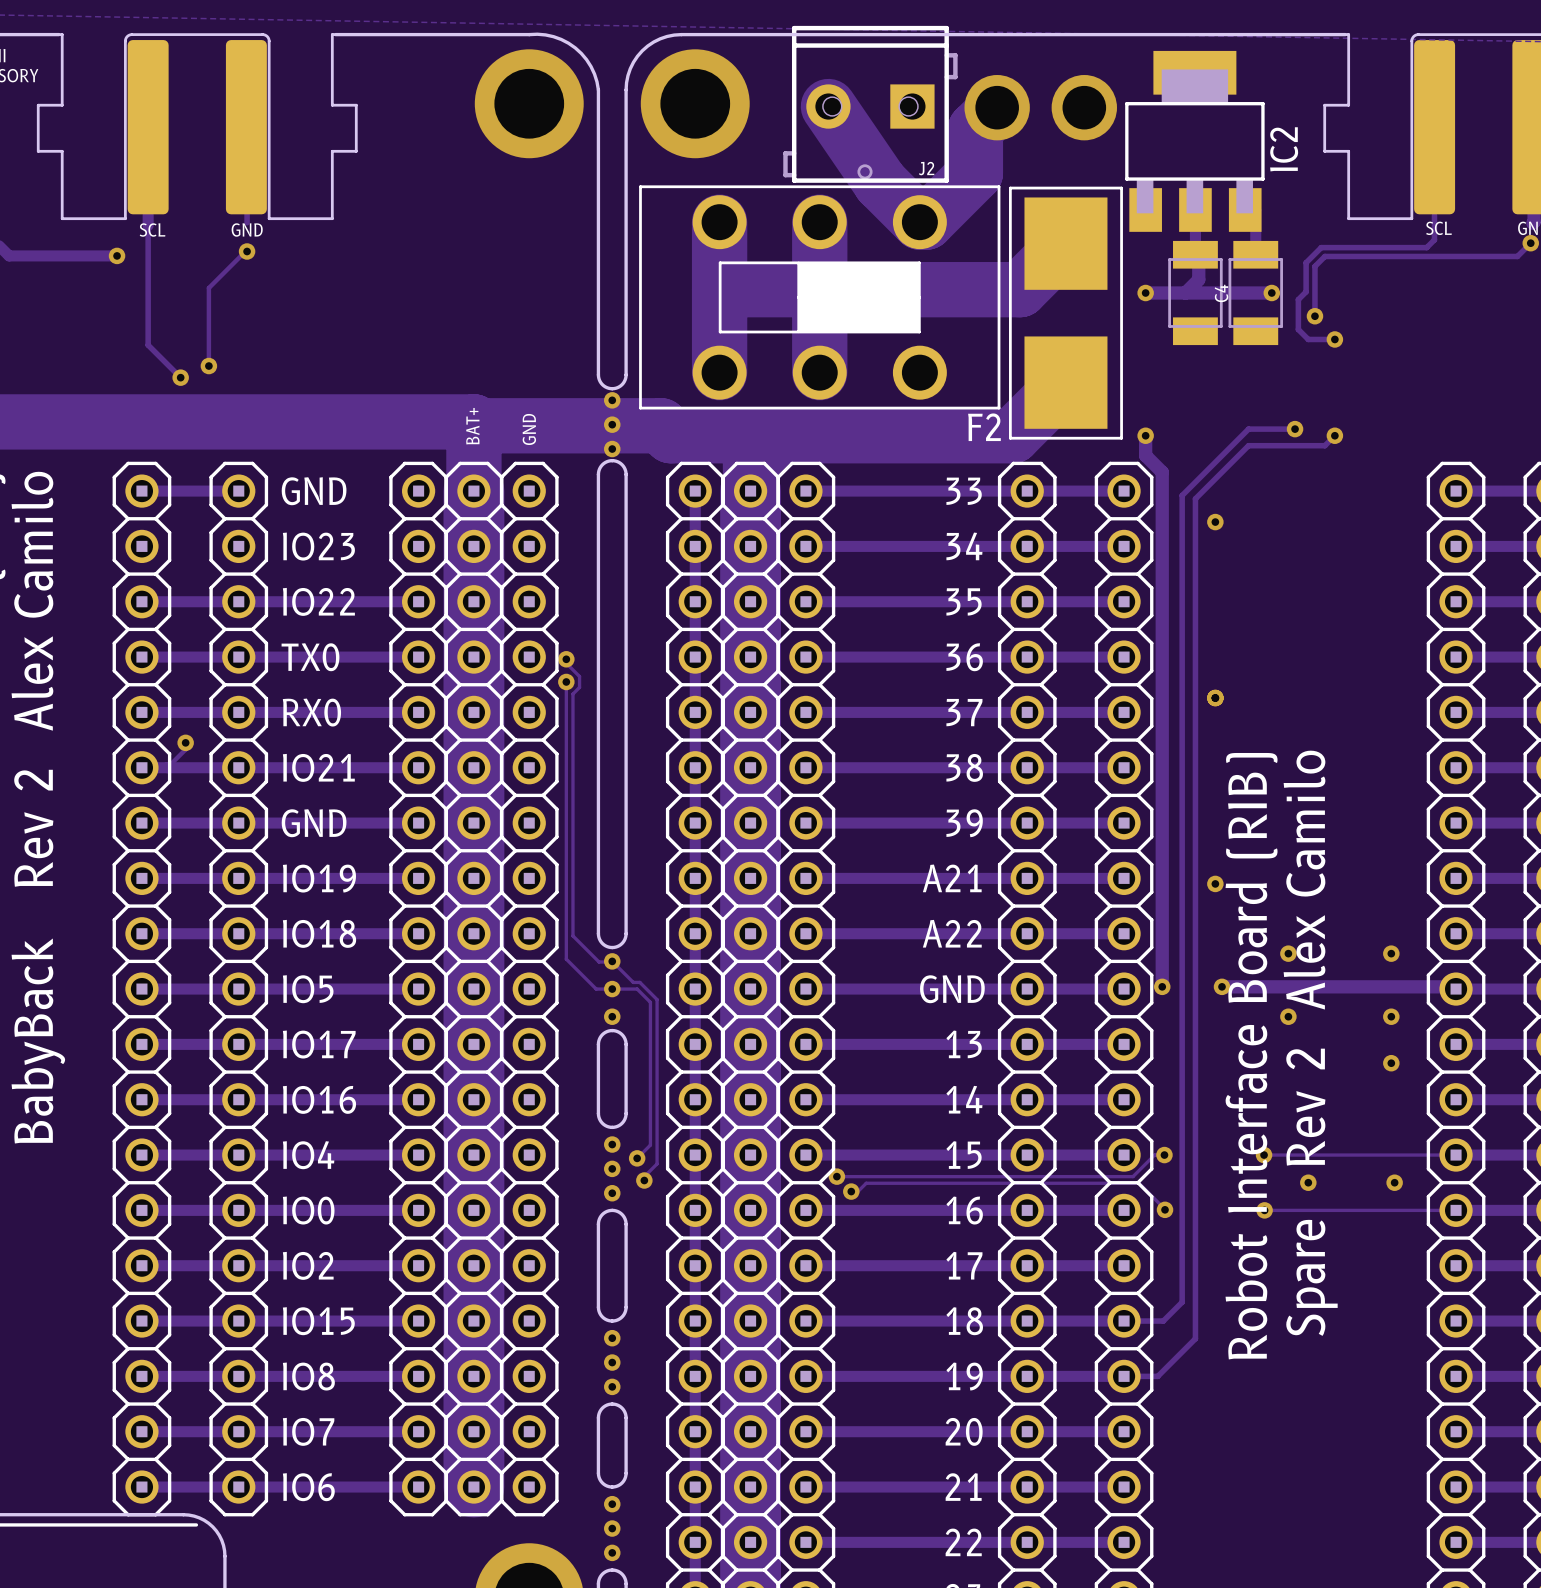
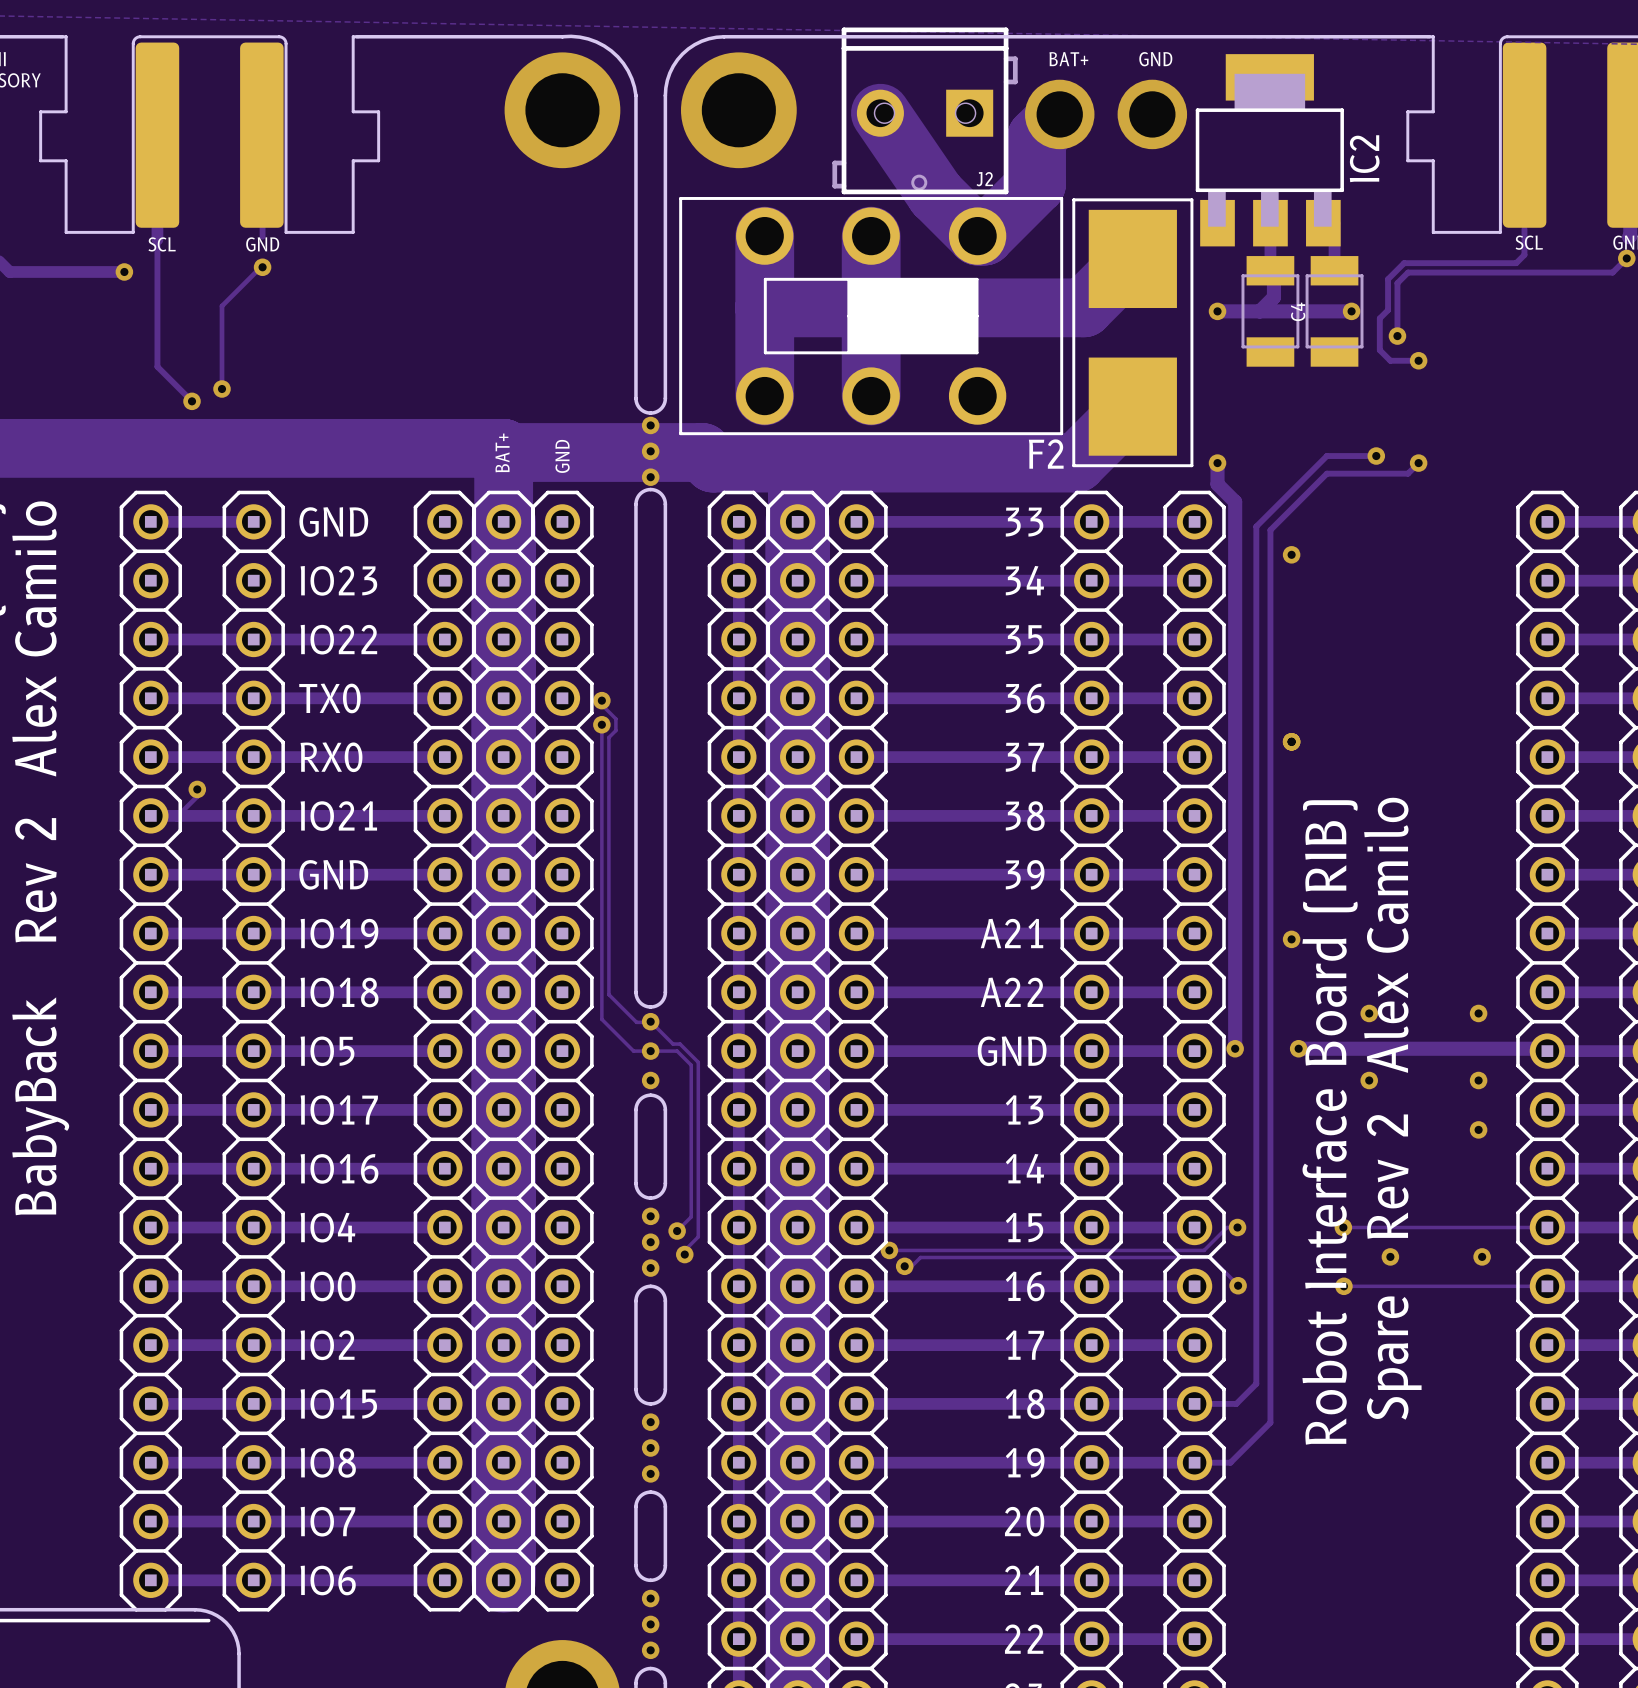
text: none -> BAT+ (1068, 59)
text: none -> GND (1155, 59)

